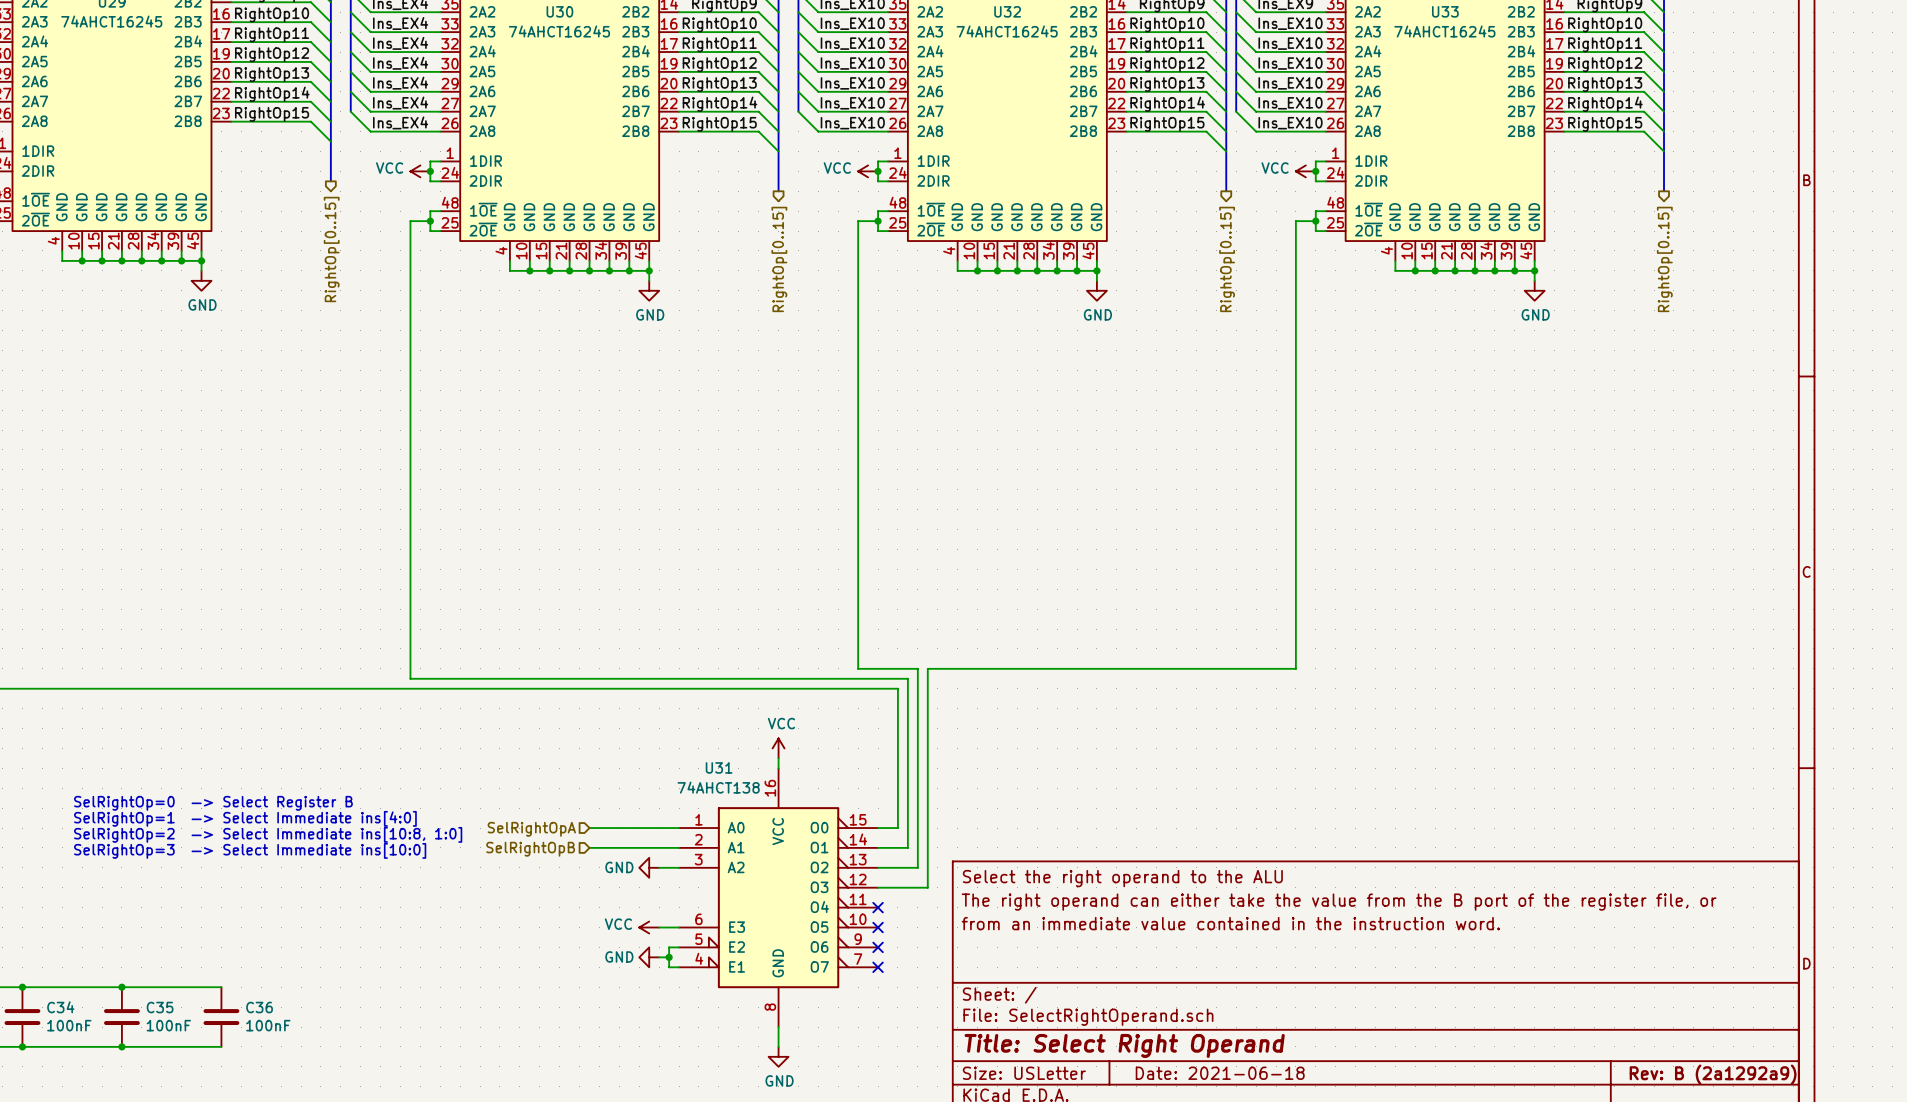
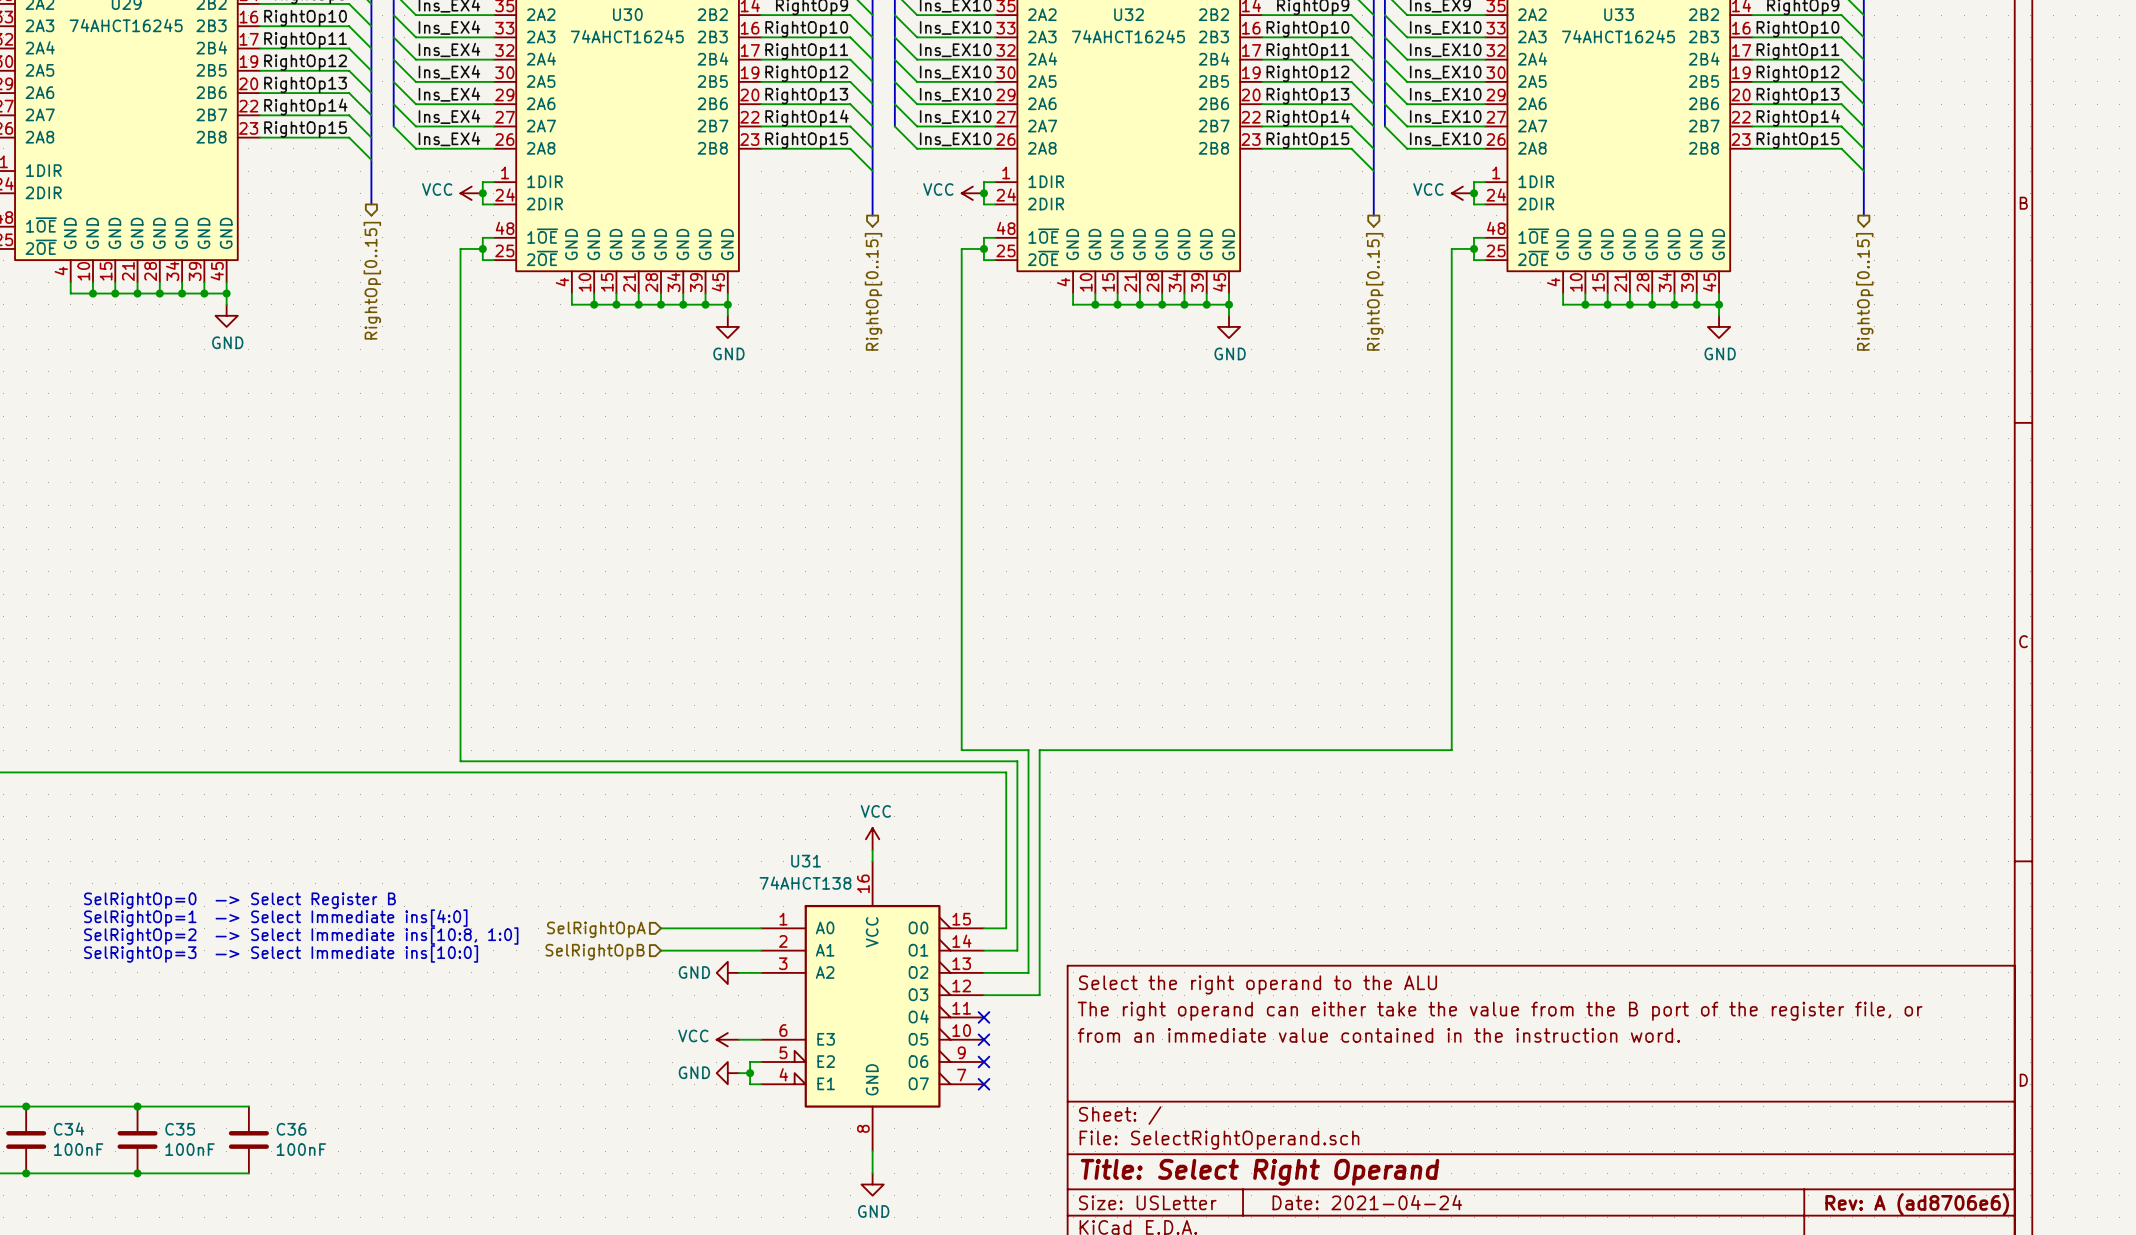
title block: Date: 2021-06-18 (1220, 1073) -> Date: 2021-04-24 (1367, 1202)
title block: Rev: B (2a1292a9) (1713, 1074) -> Rev: A (ad8706e6) (1917, 1204)

